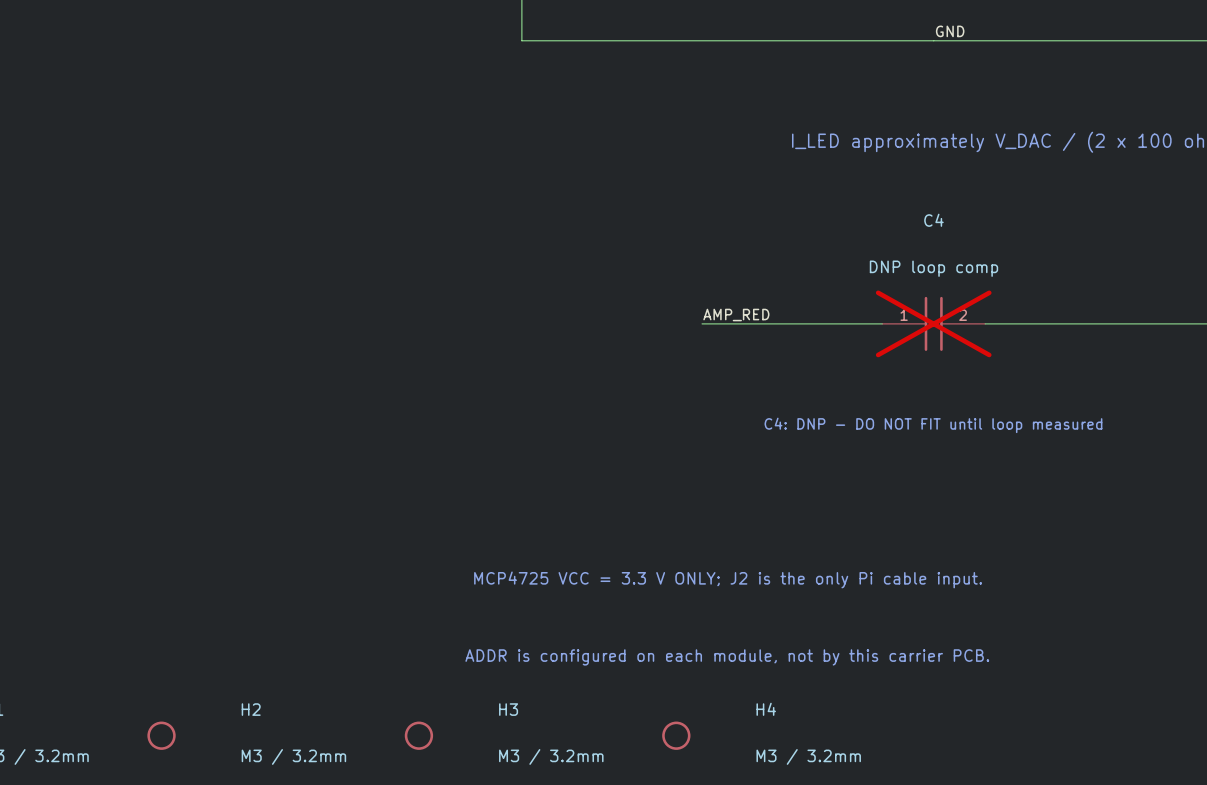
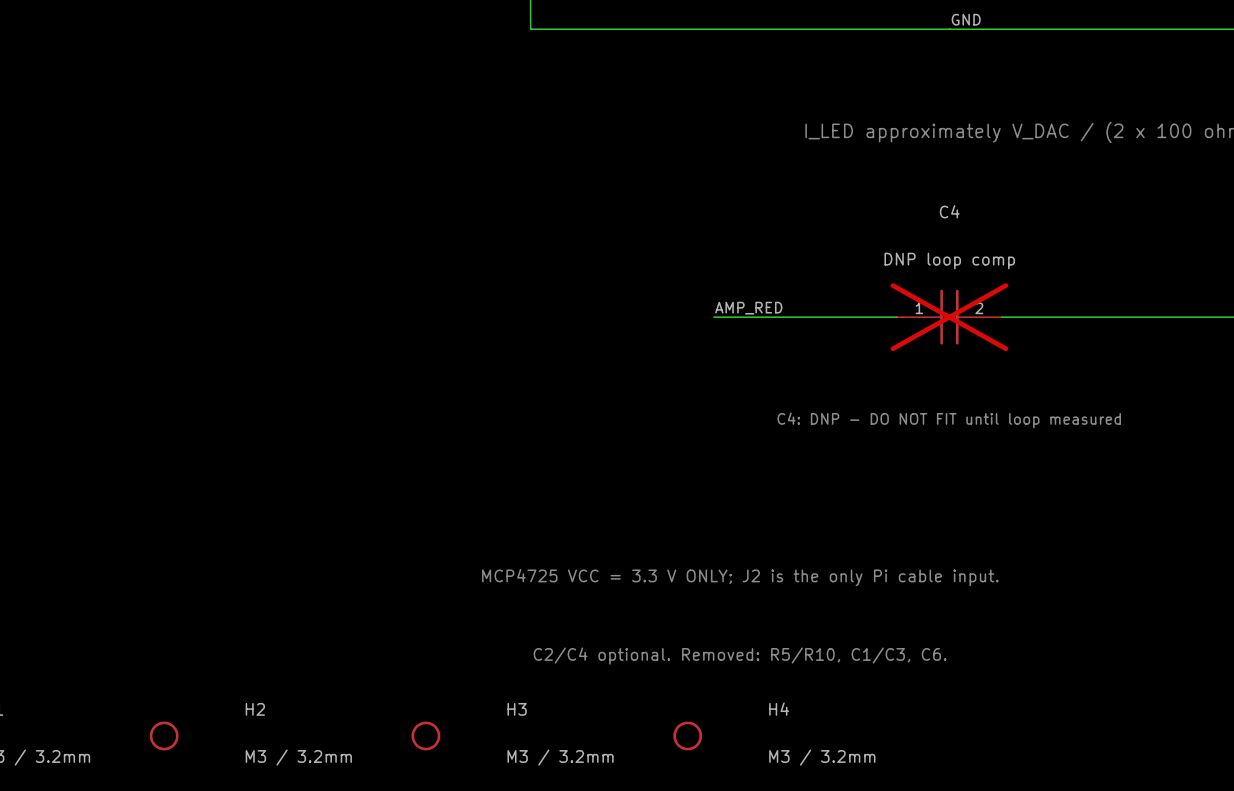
text: ADDR is configured on each module, not by this carrier PCB. (727, 657) -> C2/C4 optional. Removed: R5/R10, C1/C3, C6. (740, 656)

